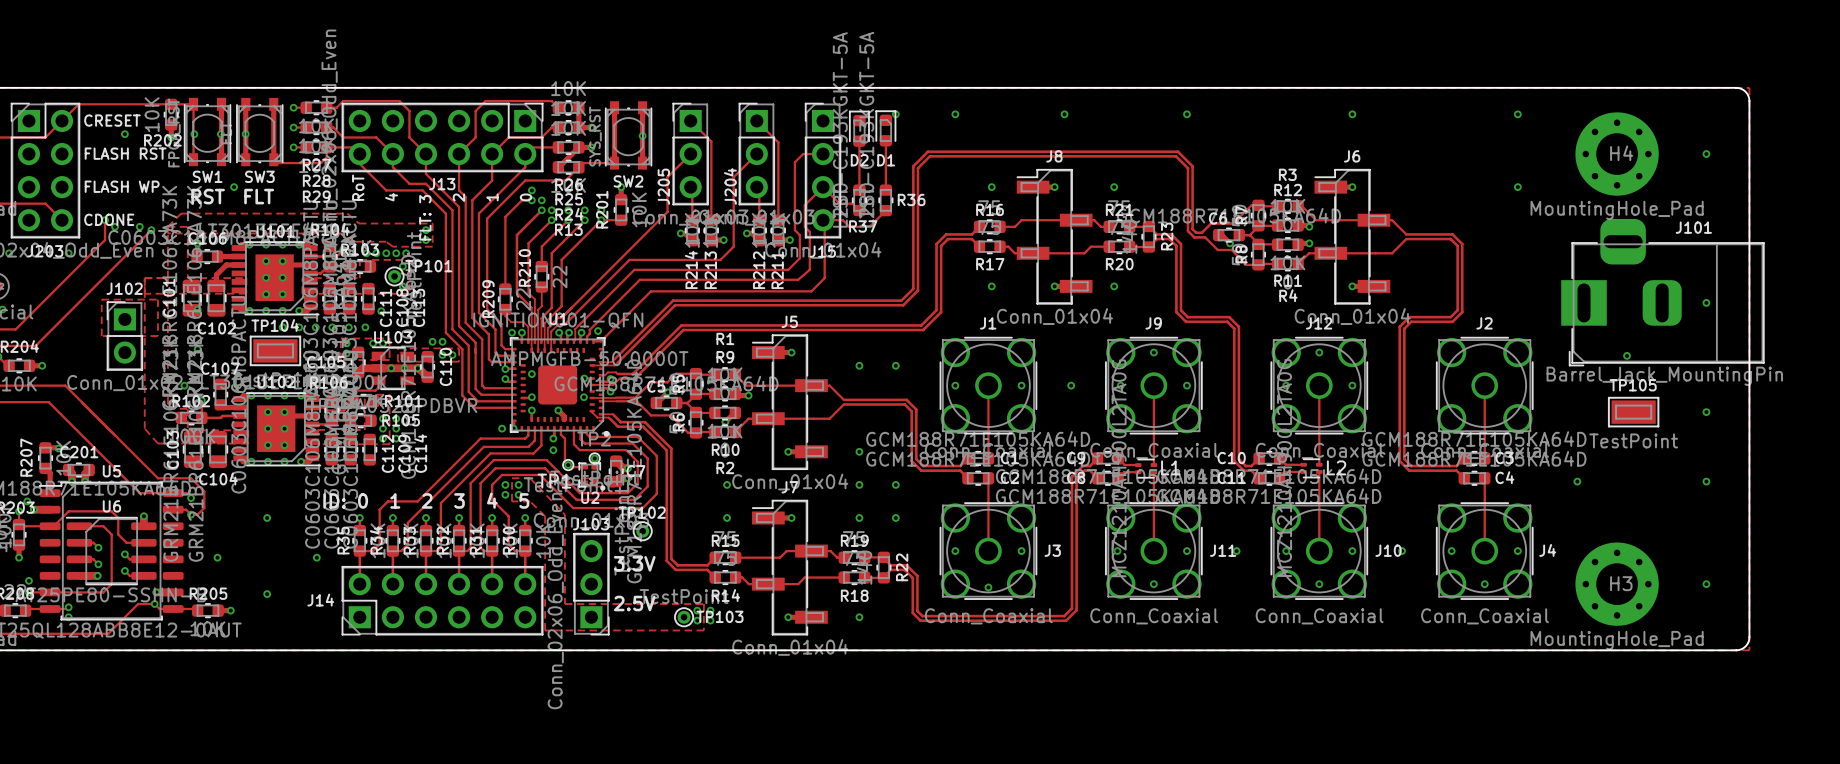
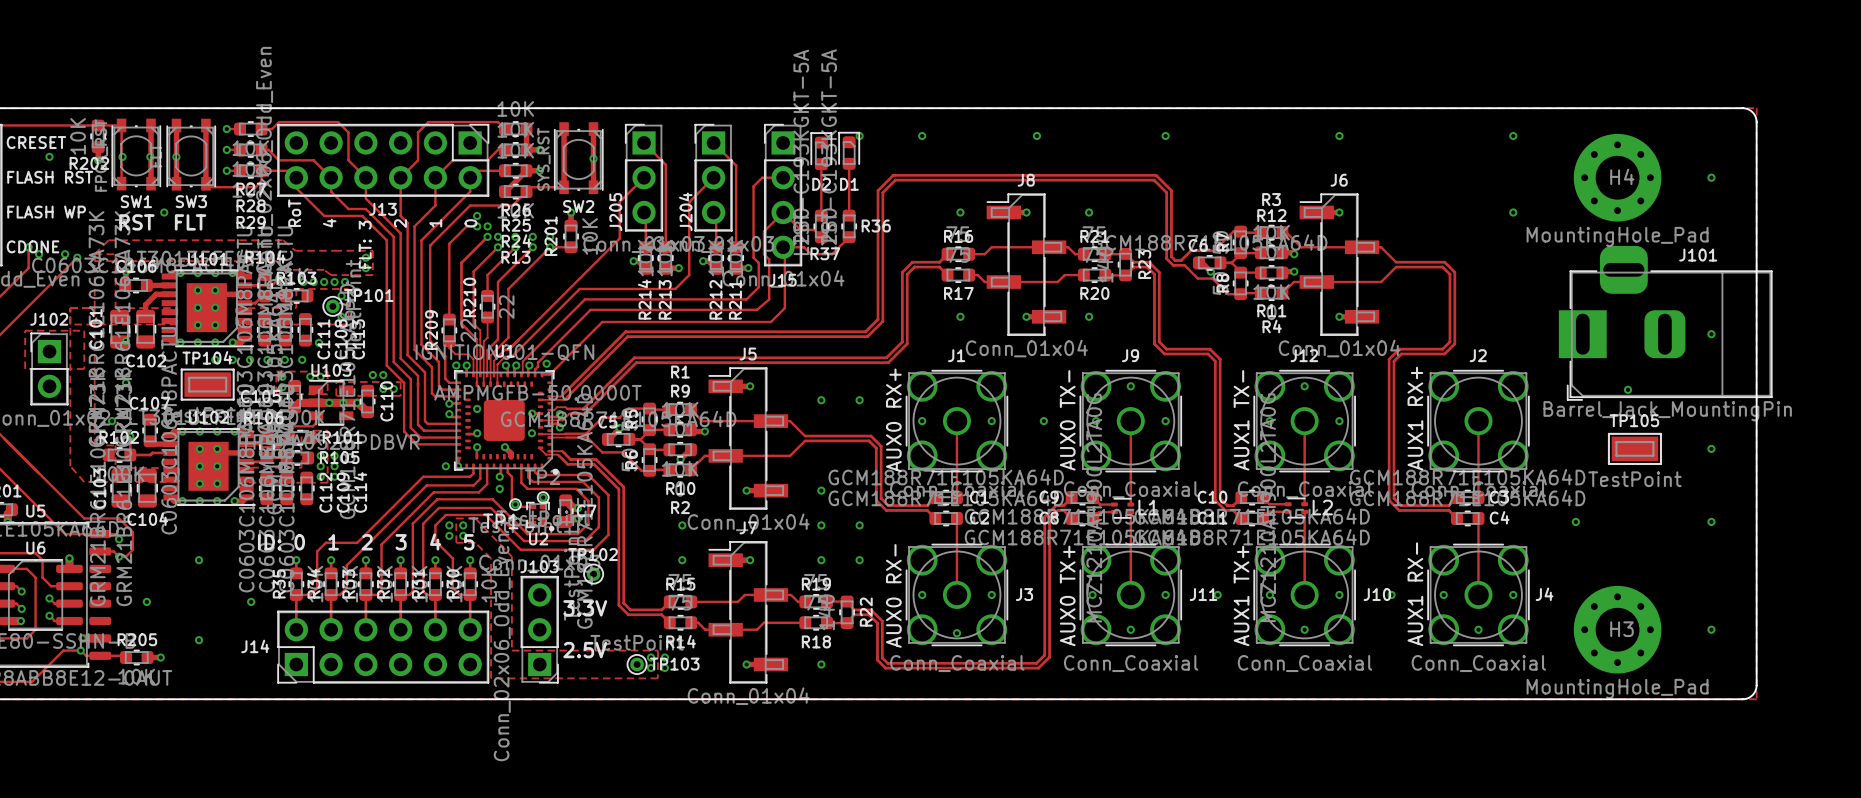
text: none -> AUX1 RX+ (1415, 418)
text: none -> AUX0 RX+ (893, 420)
text: none -> AUX0 TX- (1067, 420)
text: none -> AUX1 TX- (1241, 420)
text: none -> AUX1 RX- (1415, 594)
text: none -> AUX0 RX- (893, 595)
text: none -> AUX0 TX+ (1067, 595)
text: none -> AUX1 TX+ (1241, 595)

